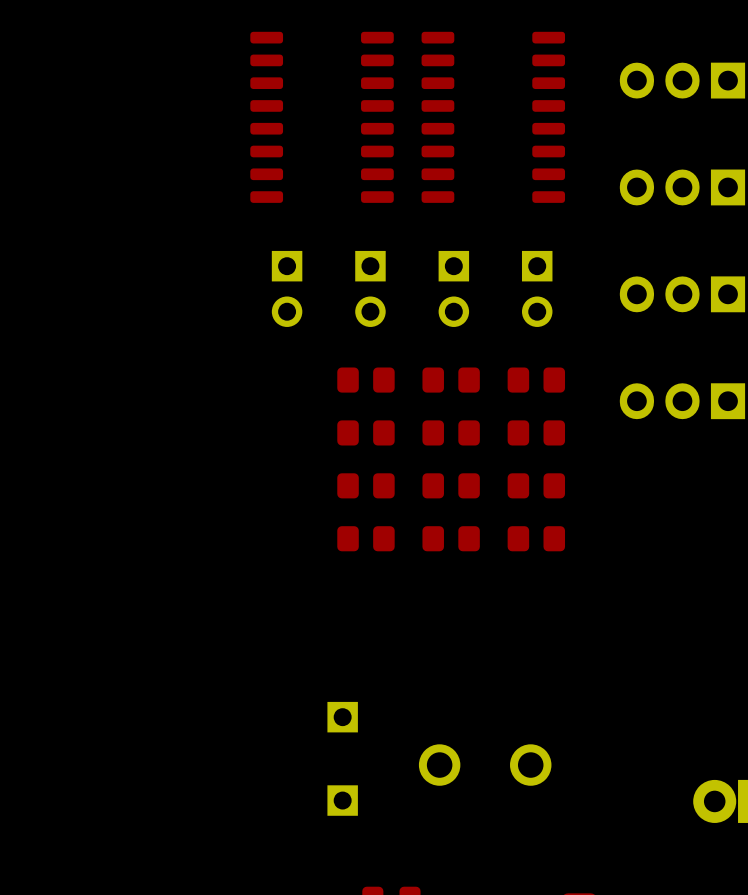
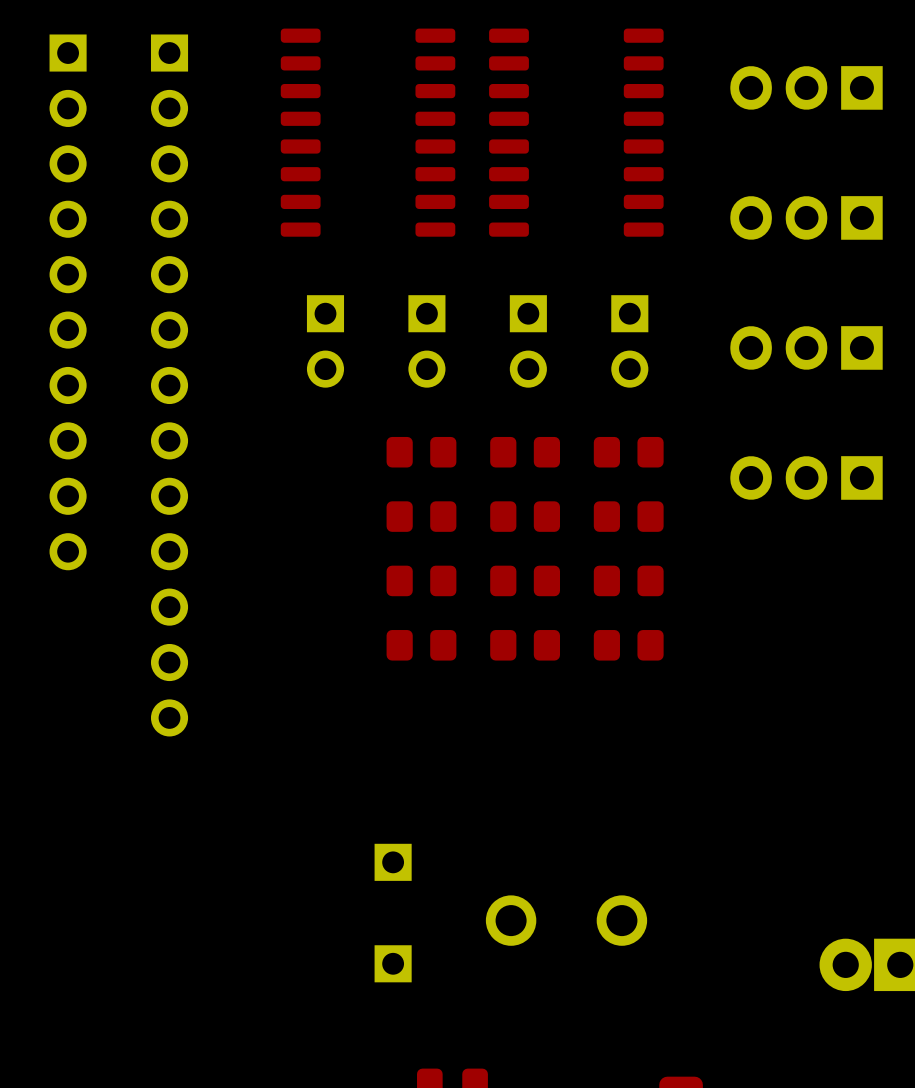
part: none -> (68, 302)
part: none -> (169, 385)

